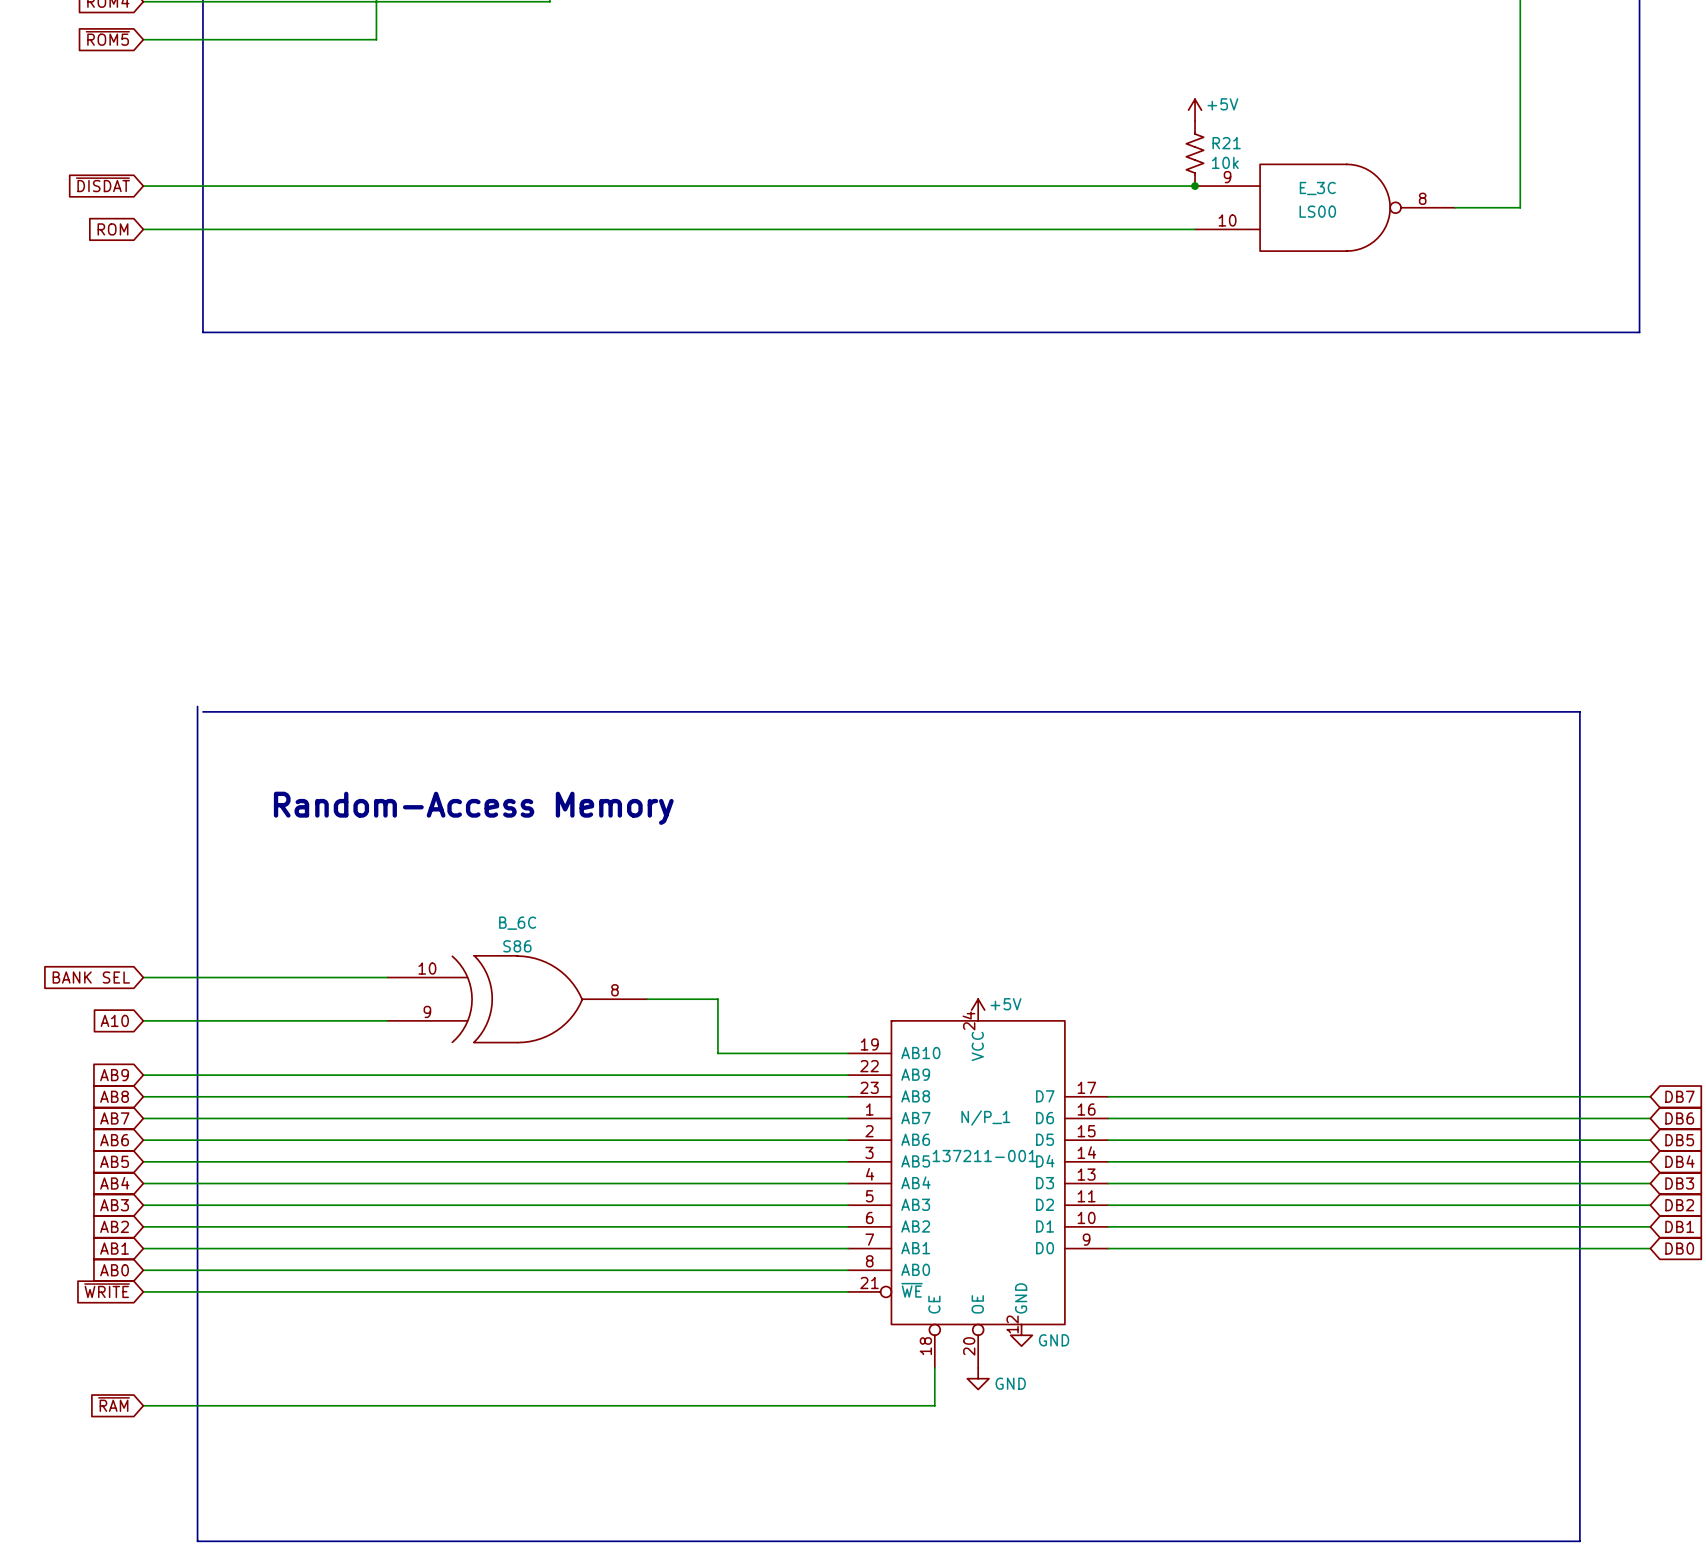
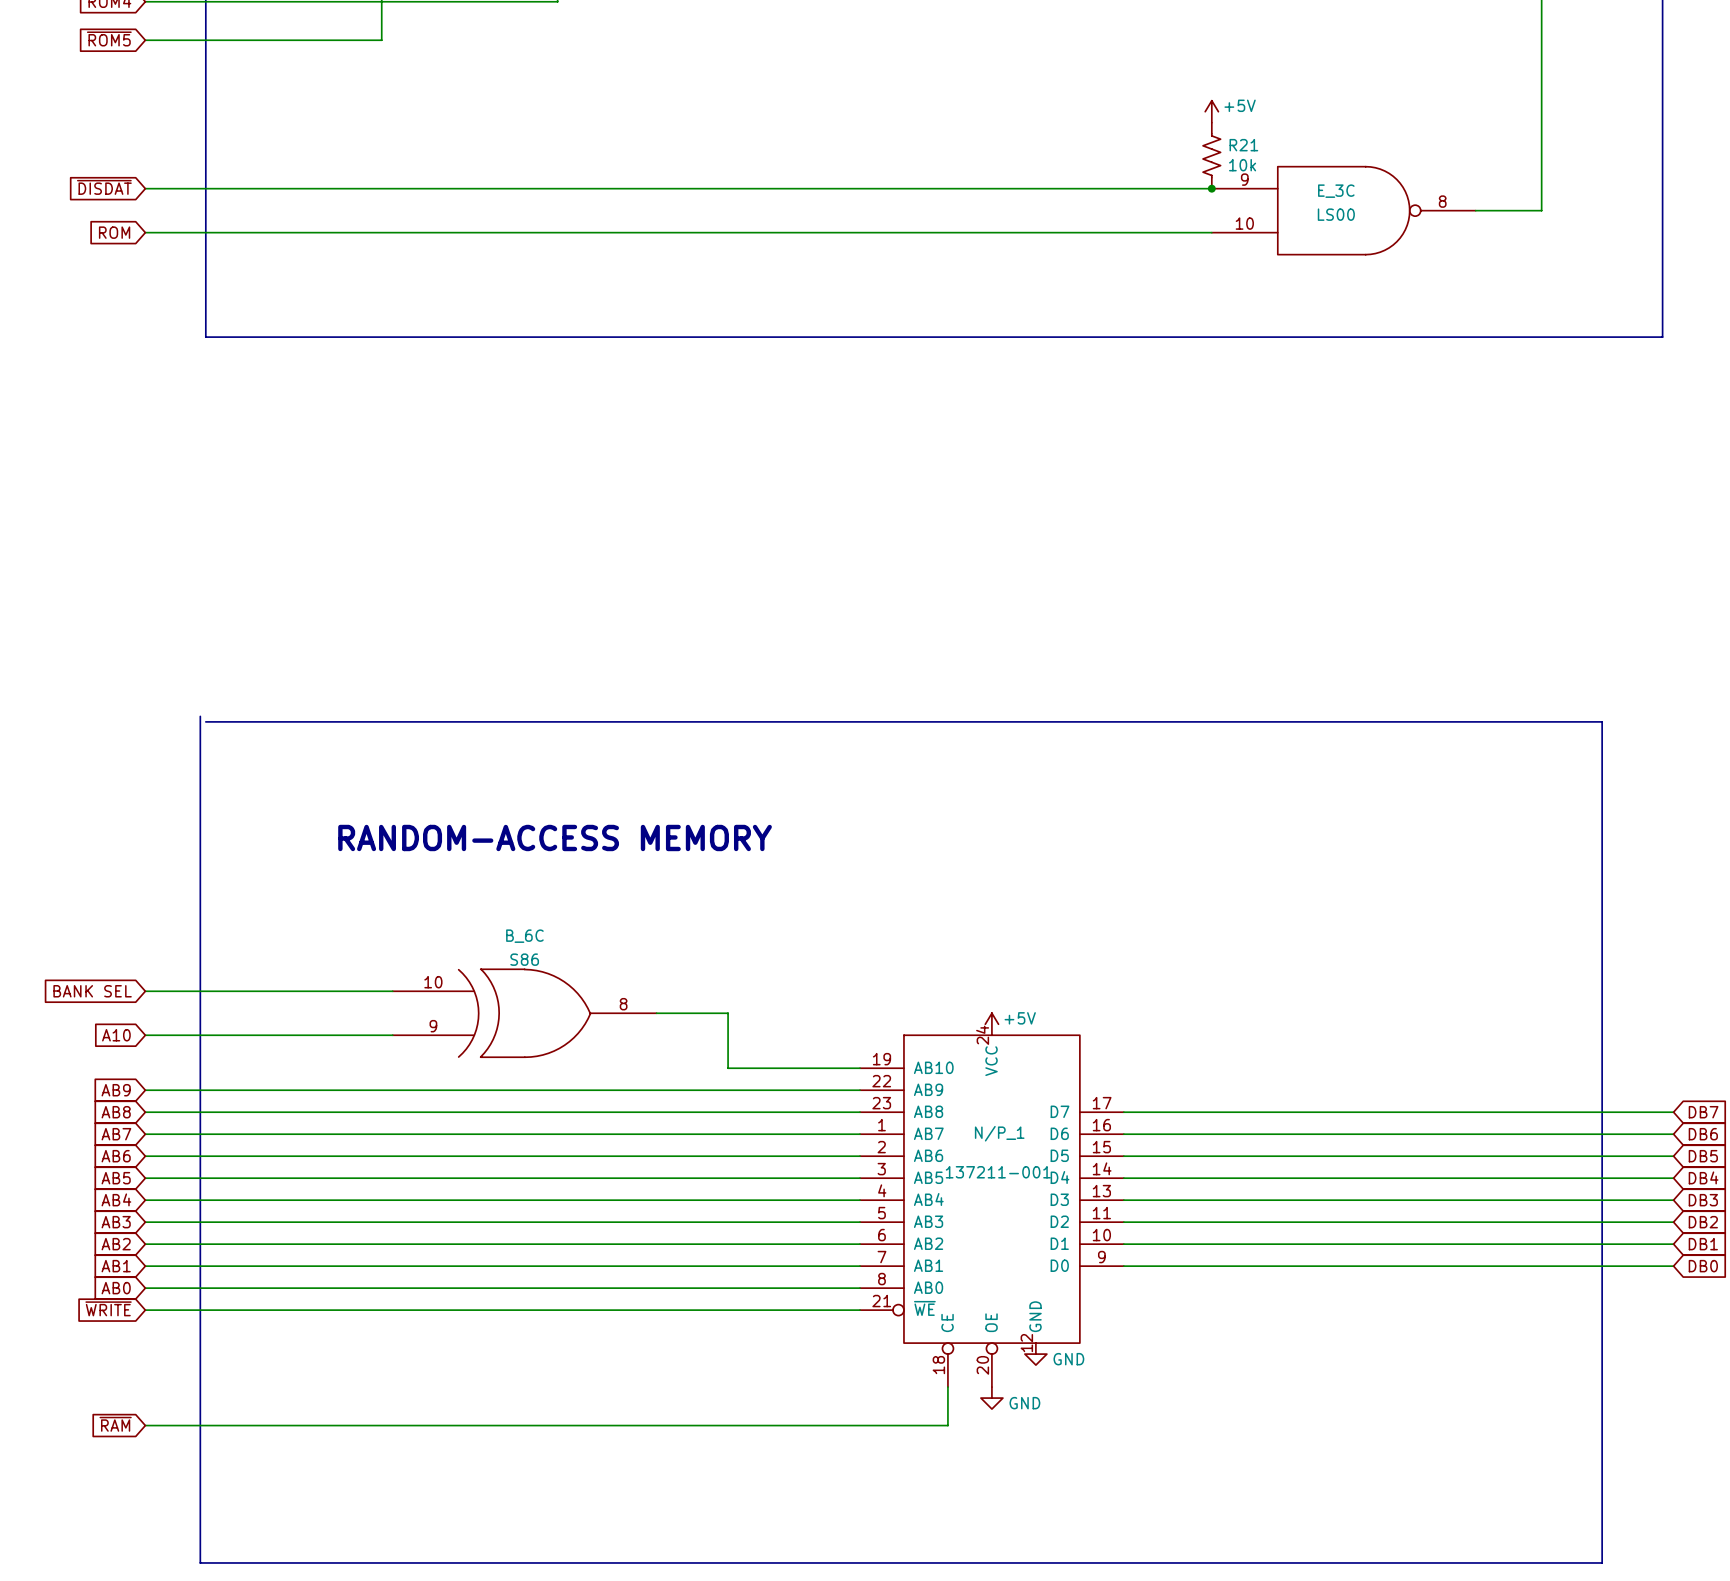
text: Random-Access Memory (473, 808) -> none
text: none -> RANDOM-ACCESS MEMORY (555, 837)

